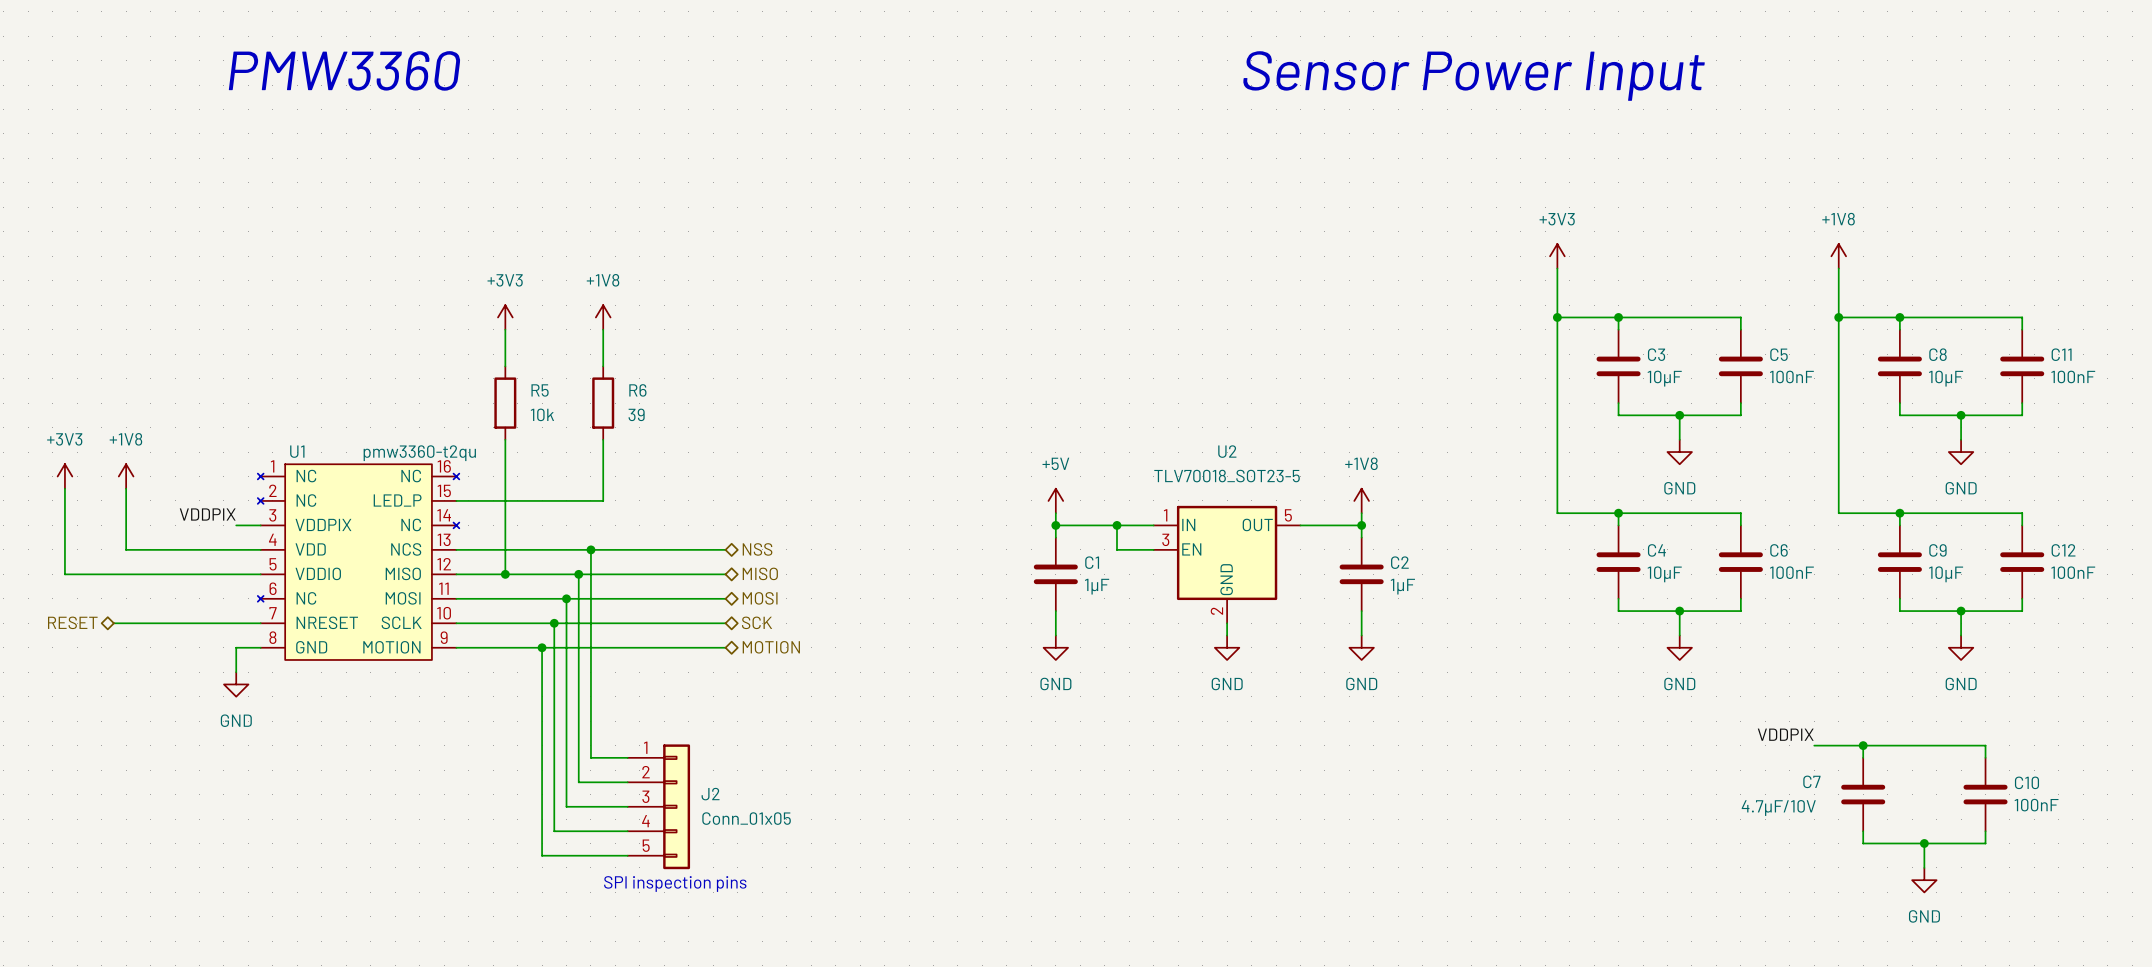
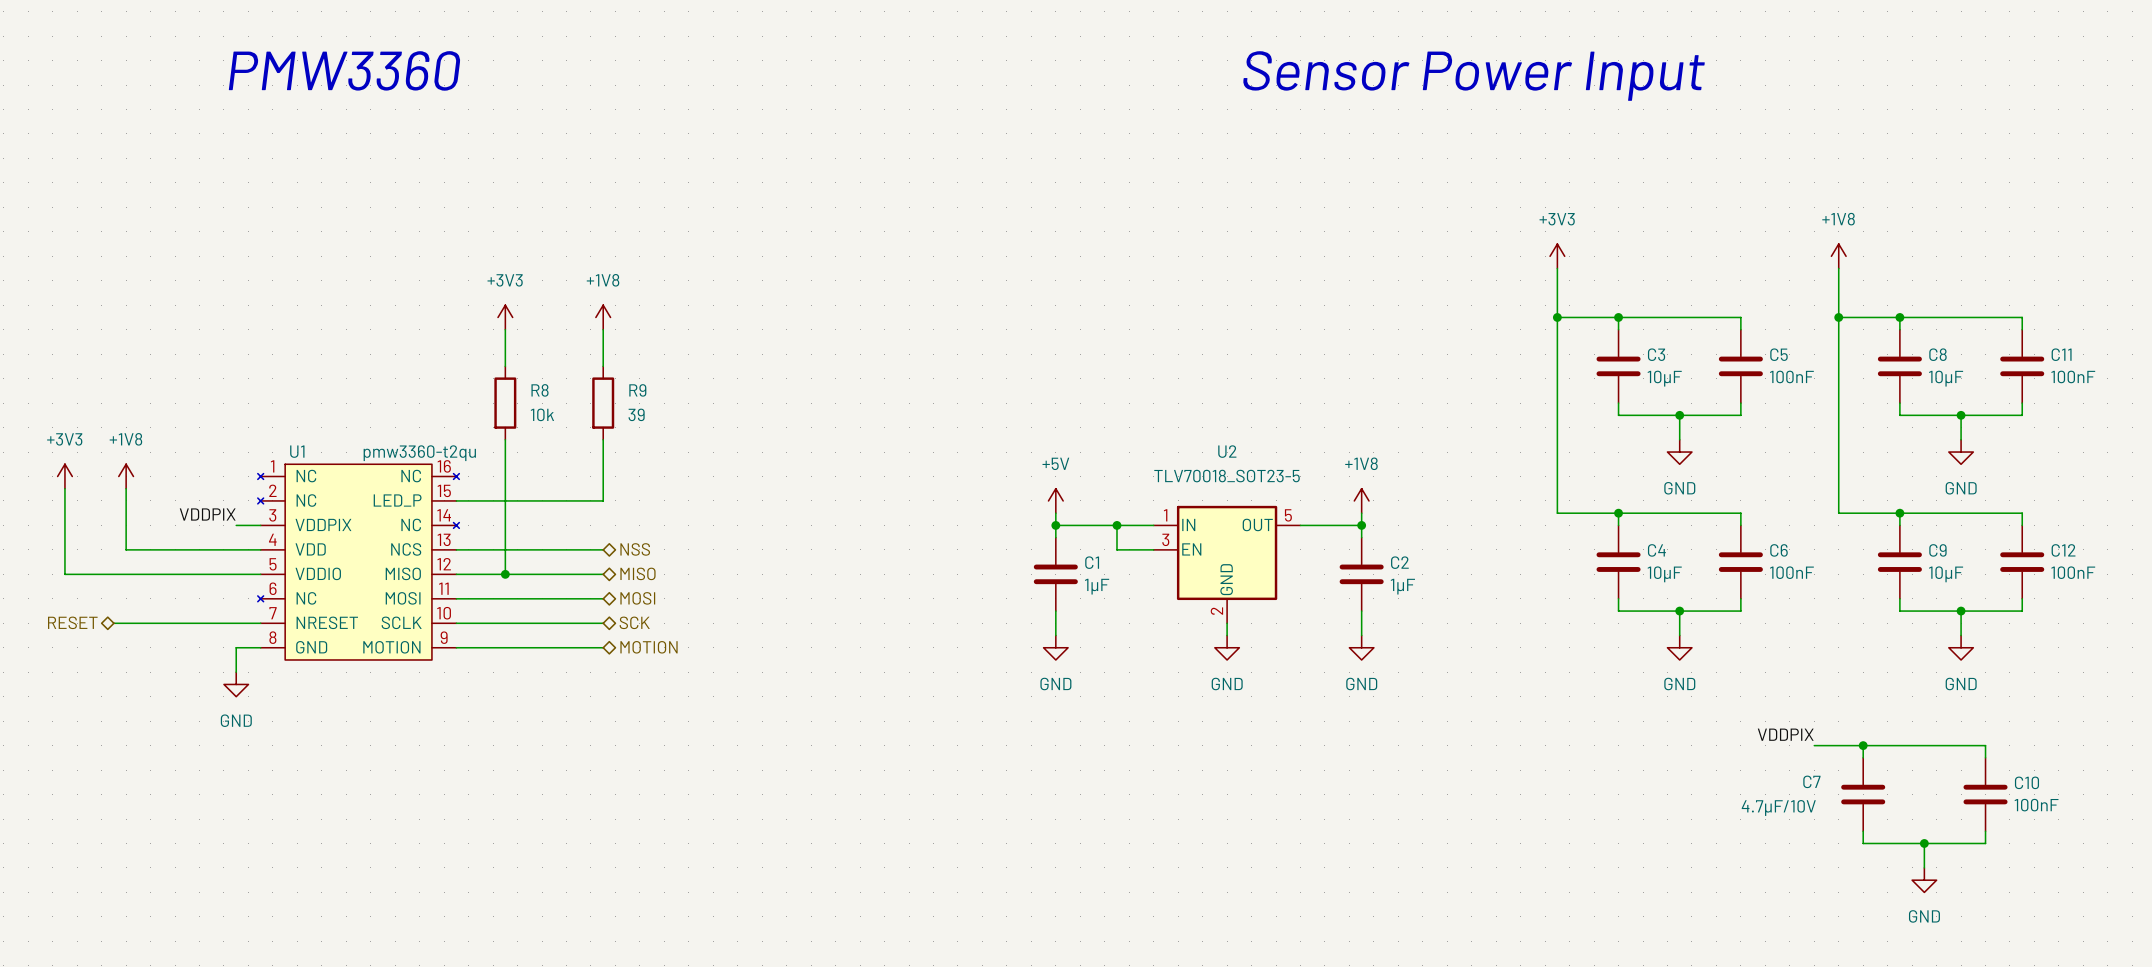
R5 name: R5 (540, 390) -> R8 (540, 390)
R6 name: R6 (637, 390) -> R9 (637, 390)
wire: (590, 549) (590, 757) (627, 757) -> none
junction: (590, 549) -> none
wire: (603, 549) (725, 549) -> none
hierarchical label position: NSS (757, 549) -> NSS (635, 549)
hierarchical label position: MISO (760, 573) -> MISO (637, 573)
wire: (578, 574) (578, 782) (627, 782) -> none
junction: (578, 574) -> none
wire: (603, 574) (725, 574) -> none
wire: (566, 598) (566, 806) (627, 806) -> none
junction: (566, 598) -> none
wire: (603, 598) (725, 598) -> none
hierarchical label position: MOSI (760, 598) -> MOSI (637, 598)
hierarchical label position: SCK (757, 622) -> SCK (634, 622)
wire: (554, 623) (554, 831) (627, 831) -> none
junction: (554, 623) -> none
wire: (603, 623) (725, 623) -> none
wire: (542, 647) (542, 855) (627, 855) -> none
junction: (542, 647) -> none
wire: (603, 647) (725, 647) -> none
hierarchical label position: MOTION (771, 647) -> MOTION (649, 647)
J2: Conn_01x05 (658, 806) -> none
text: SPI inspection pins (675, 884) -> none

